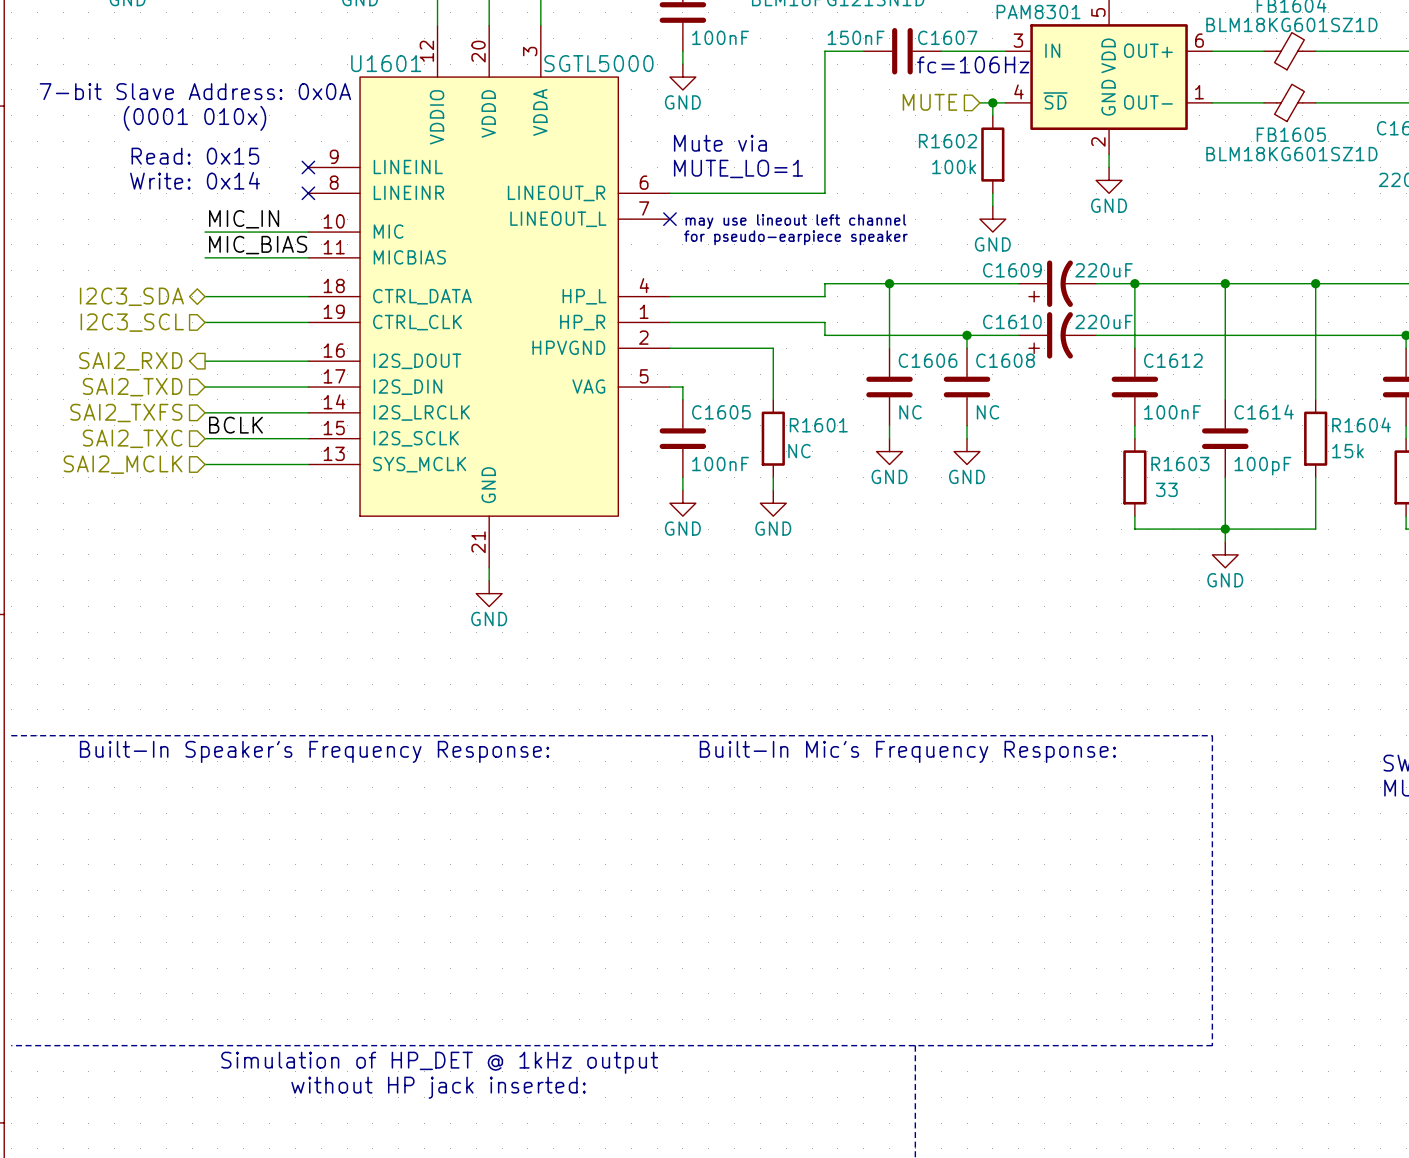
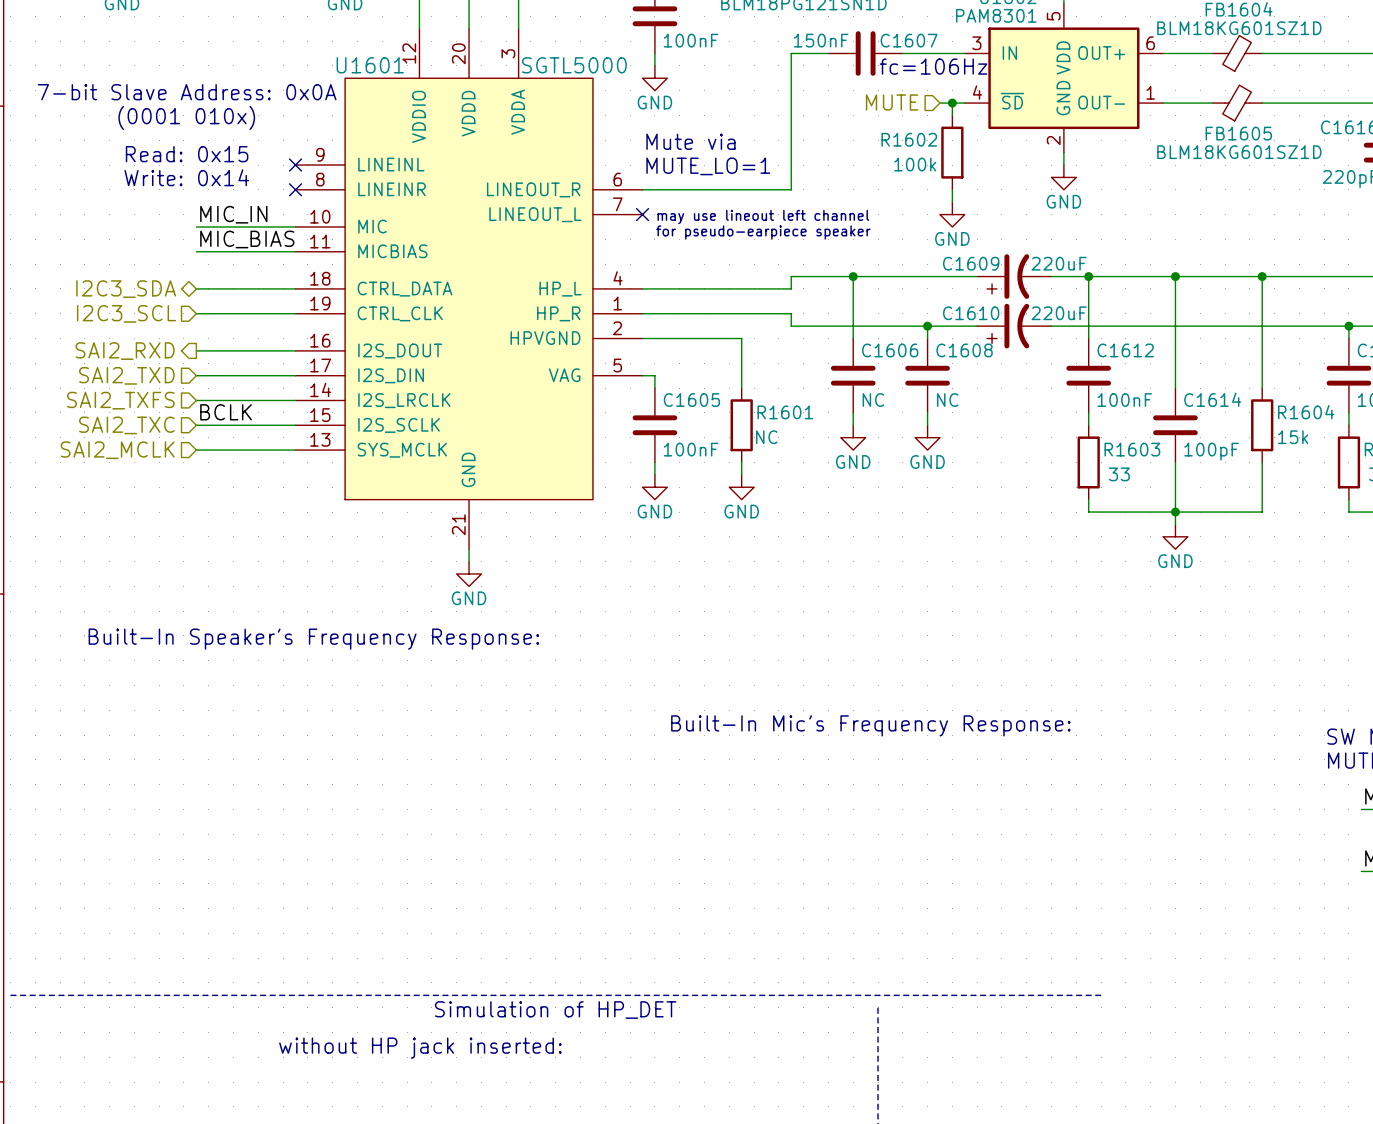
line: (11, 735) (1212, 735) (1212, 1045) (11, 1045) -> none
text position: Built-In Speaker's Frequency Response: (314, 751) -> Built-In Speaker's Frequency Response: (313, 639)
line: none -> (10, 995) (1101, 995)
text: Simulation of HP_DET @ 1kHz output (439, 1062) -> Simulation of HP_DET (555, 1010)

